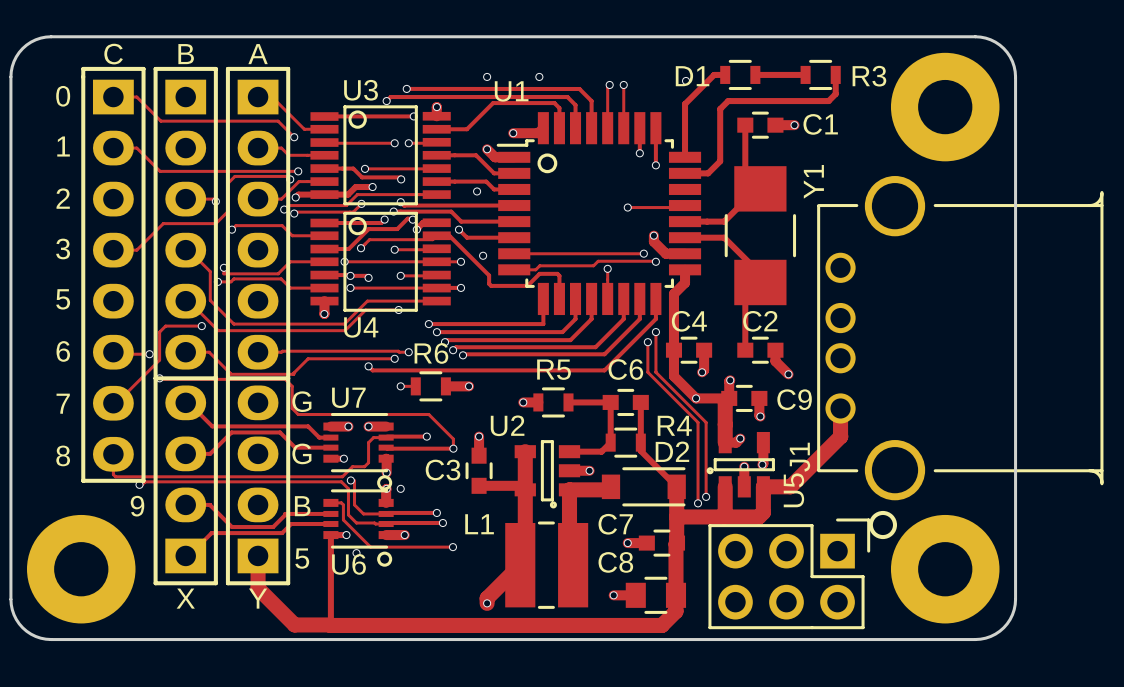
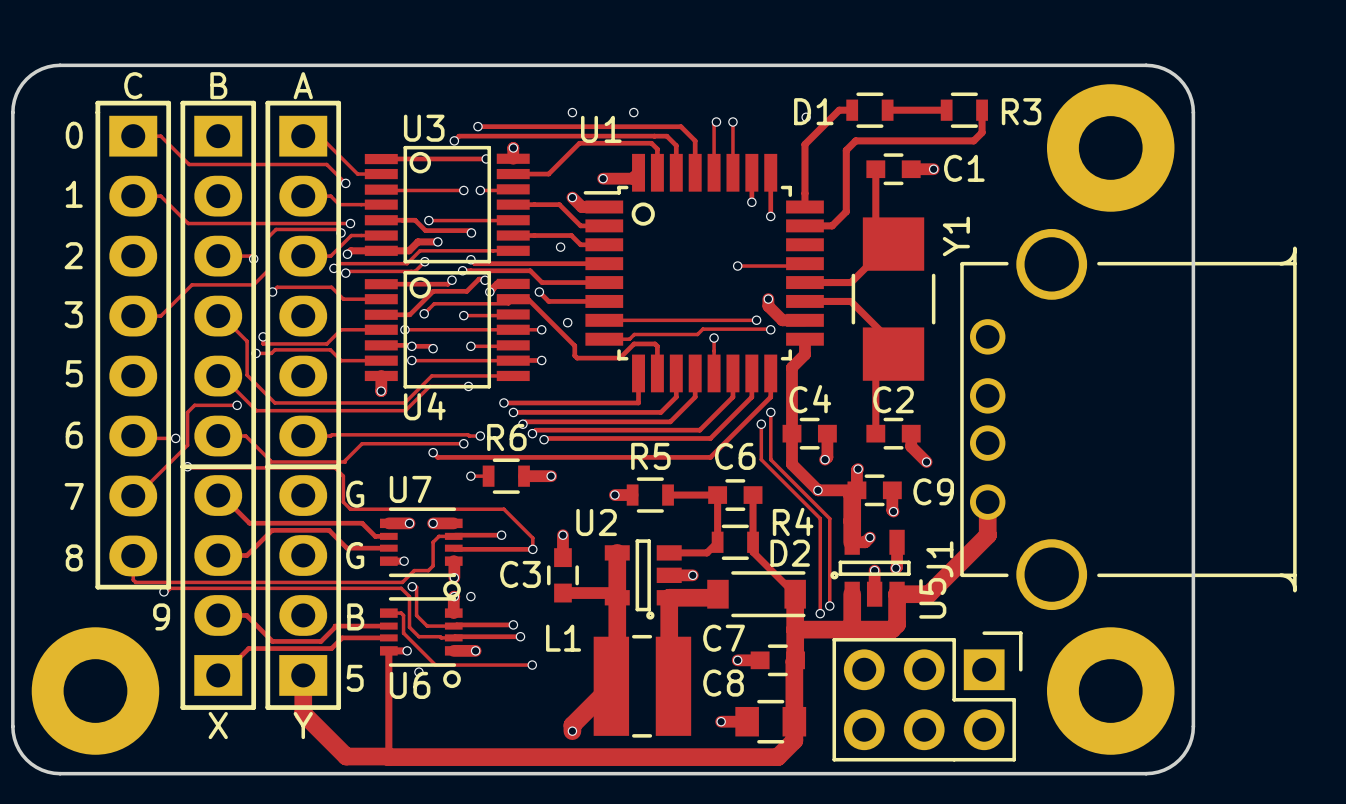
drawing: [868, 510, 898, 540] -> none

